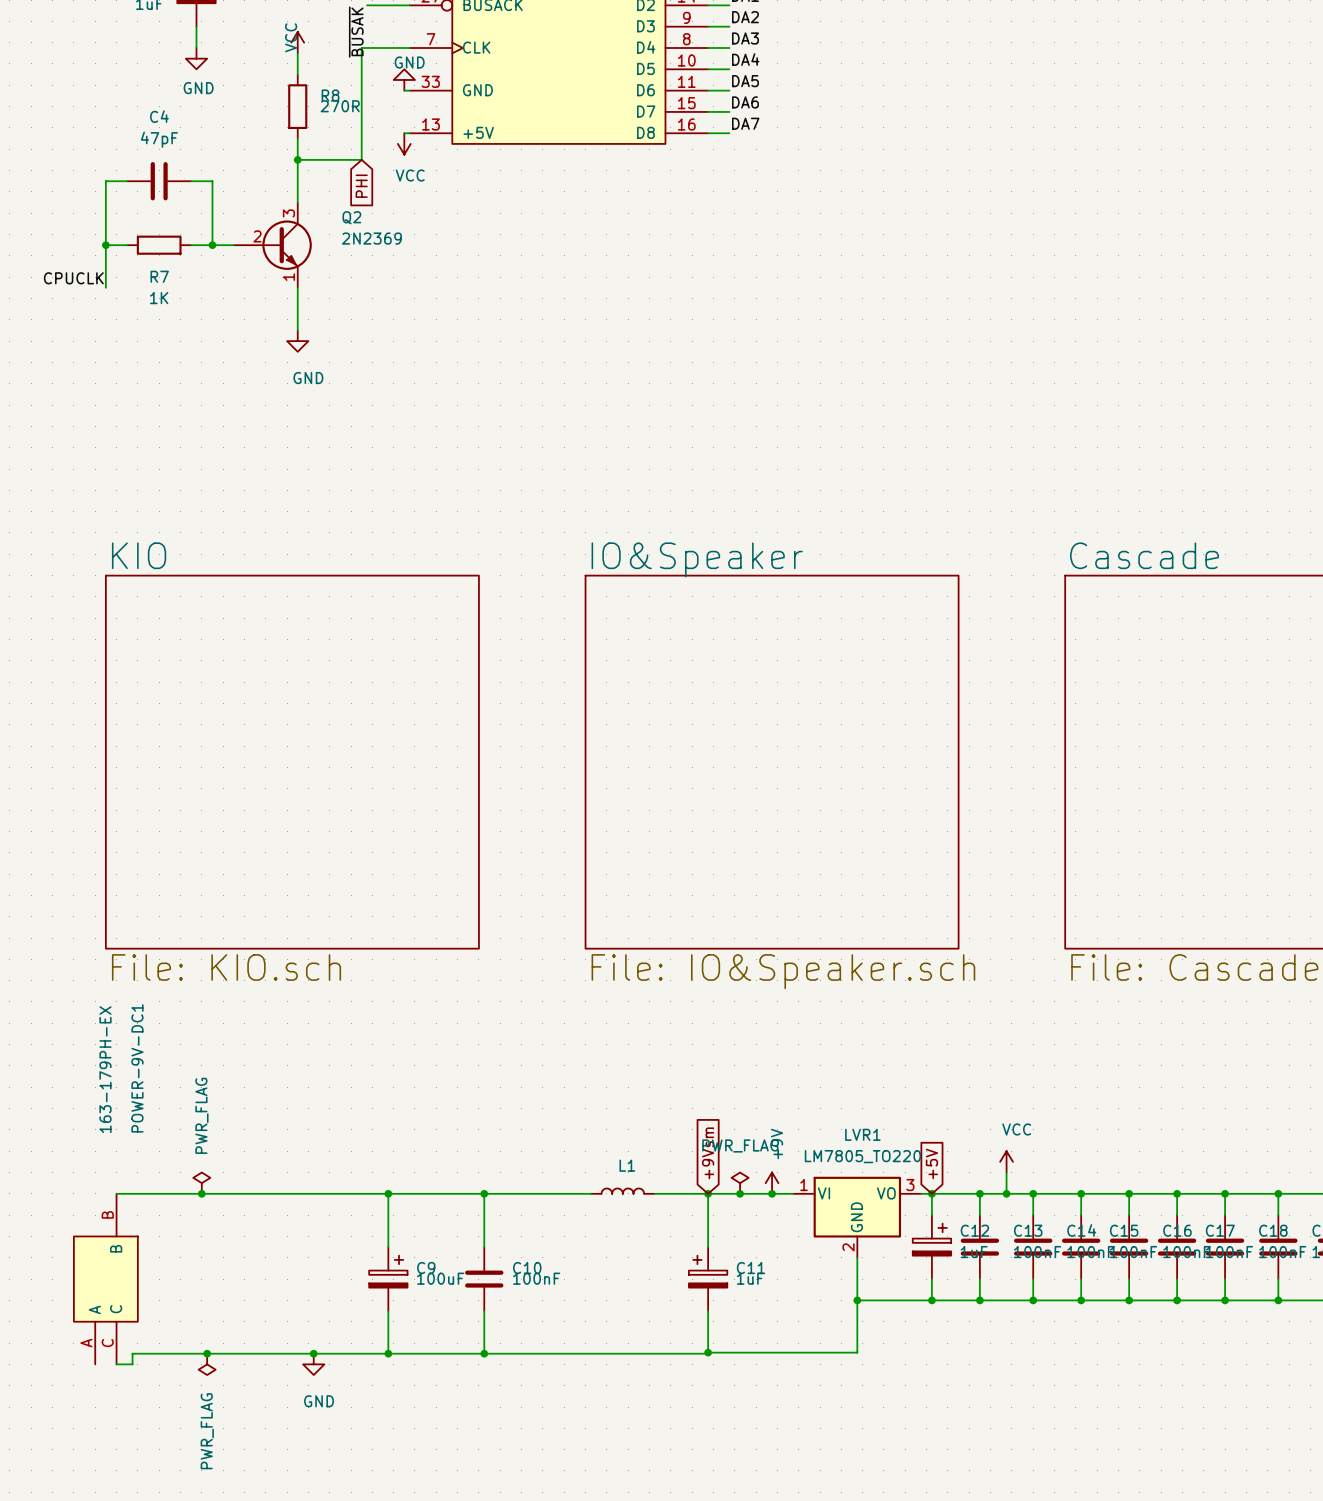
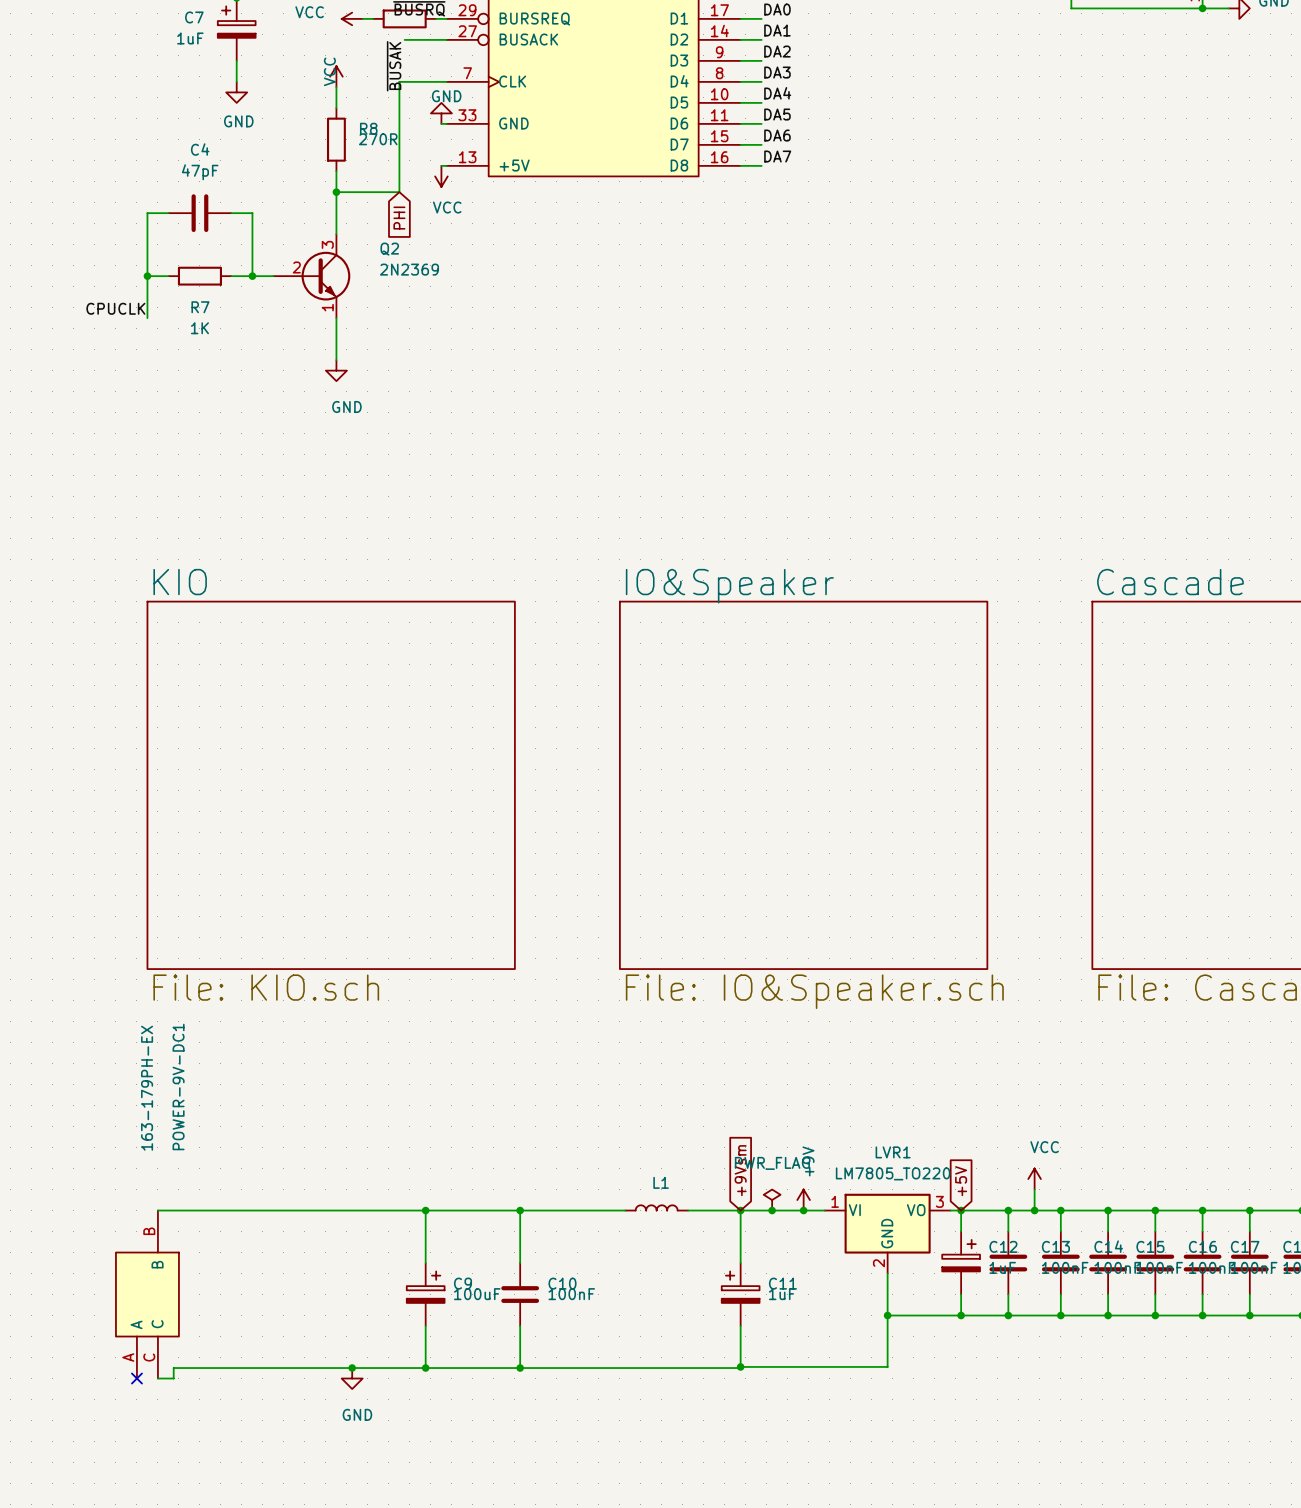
power symbol: PWR_FLAG (201, 1183) -> none
junction: (201, 1193) -> none
junction: (207, 1353) -> none
no-connect mark: none -> (136, 1378)
power symbol: PWR_FLAG (207, 1364) -> none

